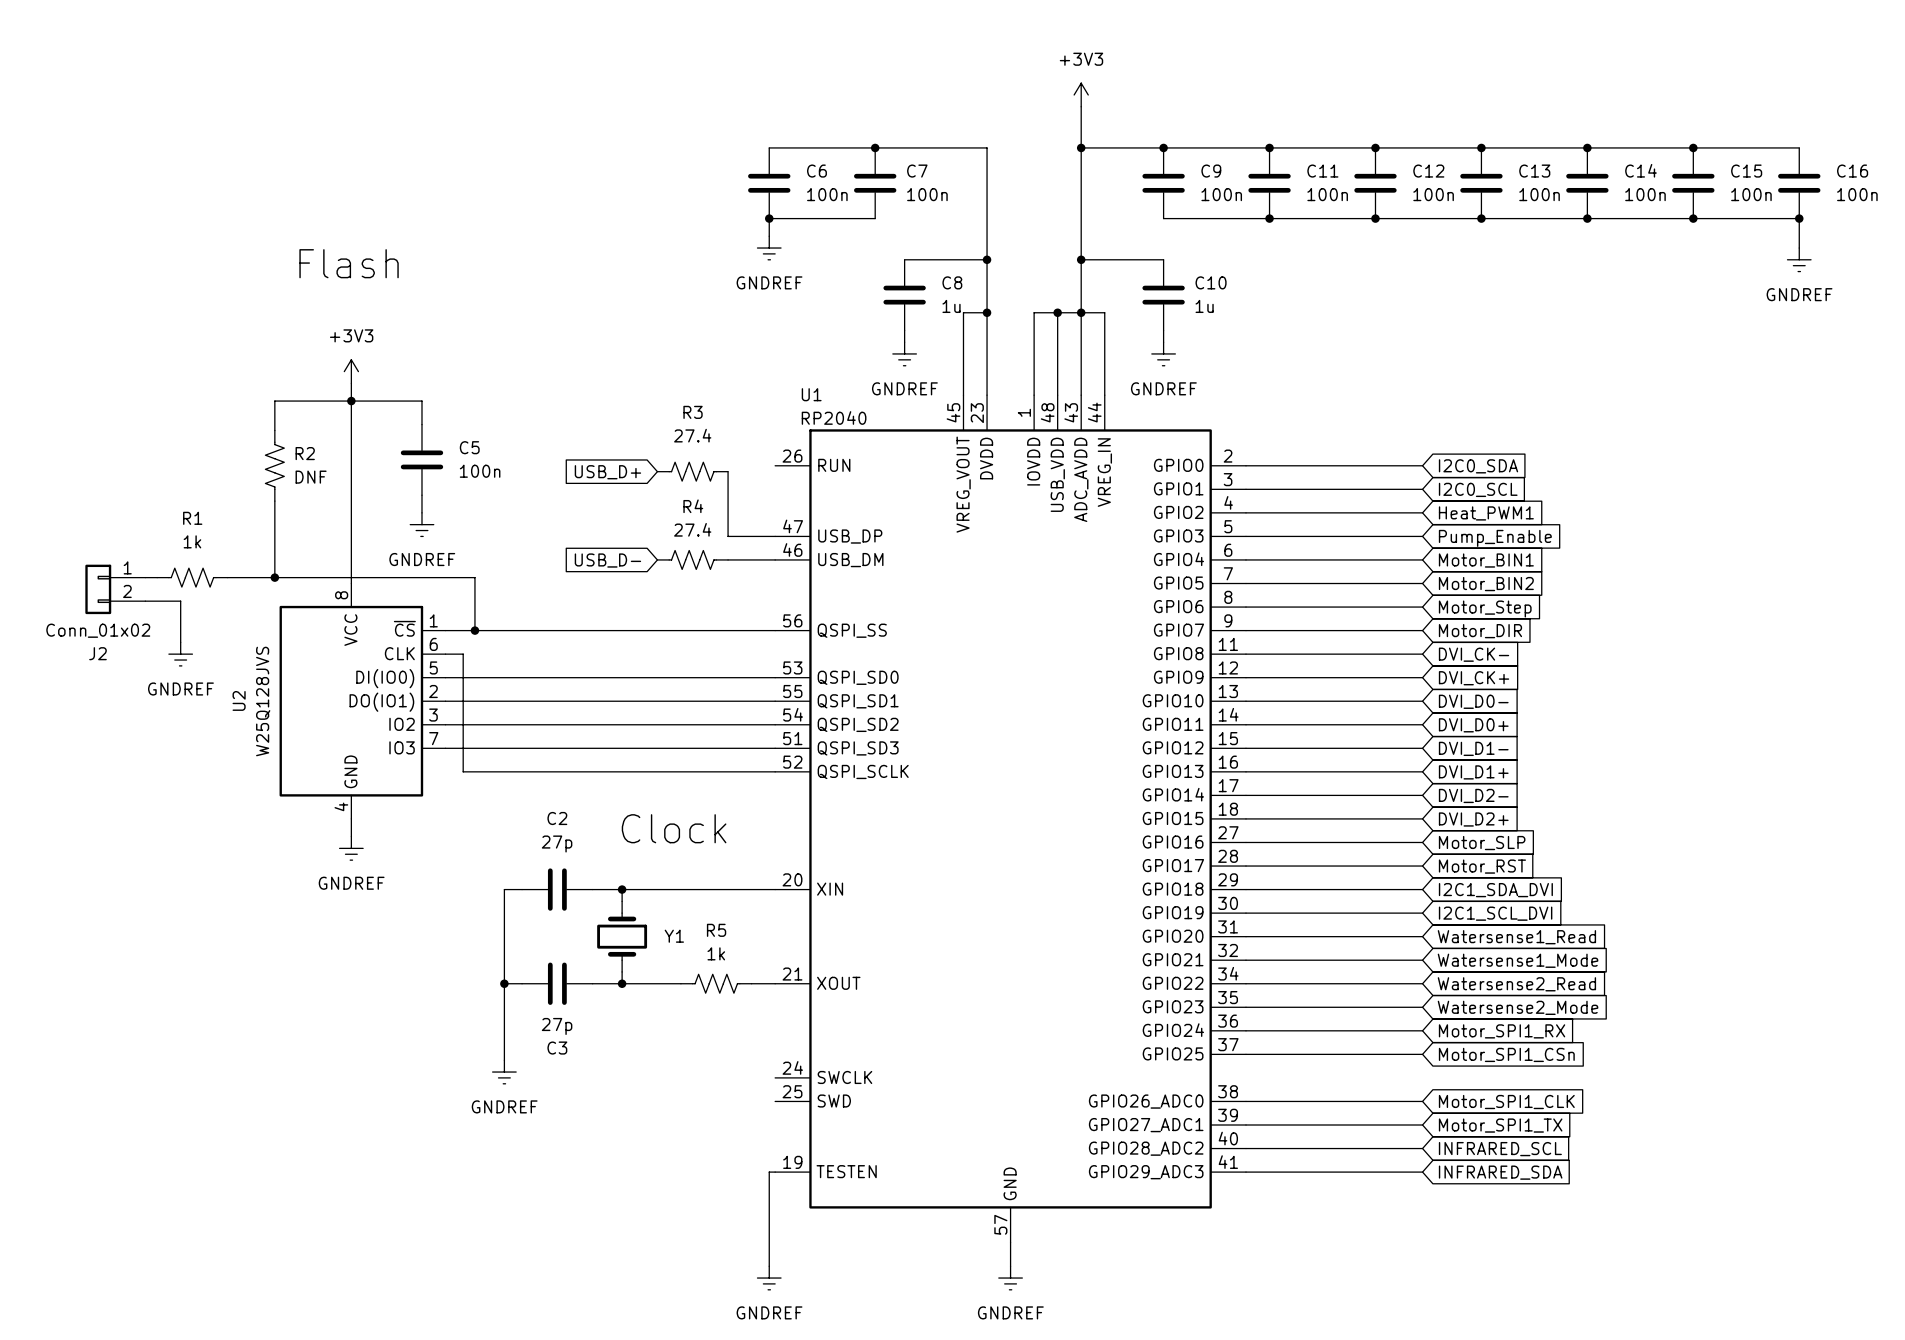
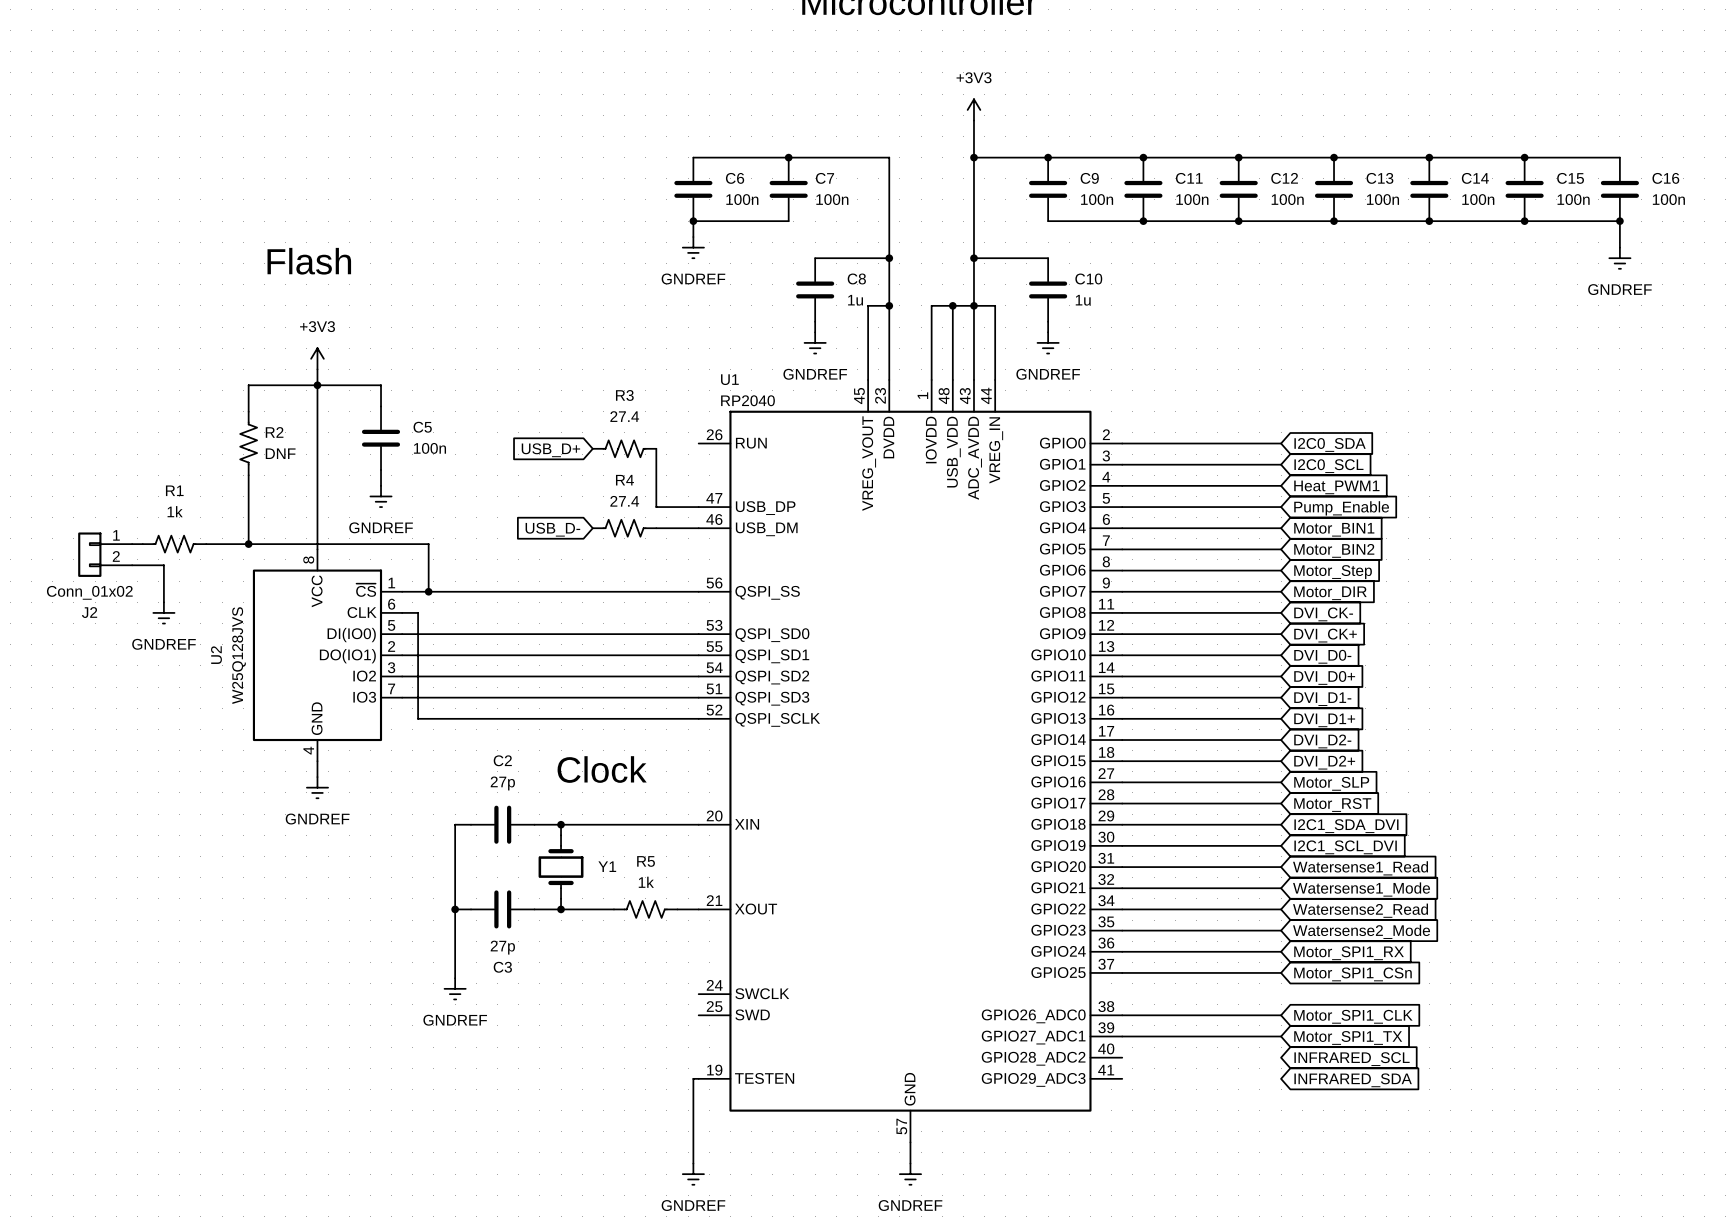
wire: (1246, 1148) (1422, 1148) -> none
wire: (1246, 1172) (1422, 1172) -> none

